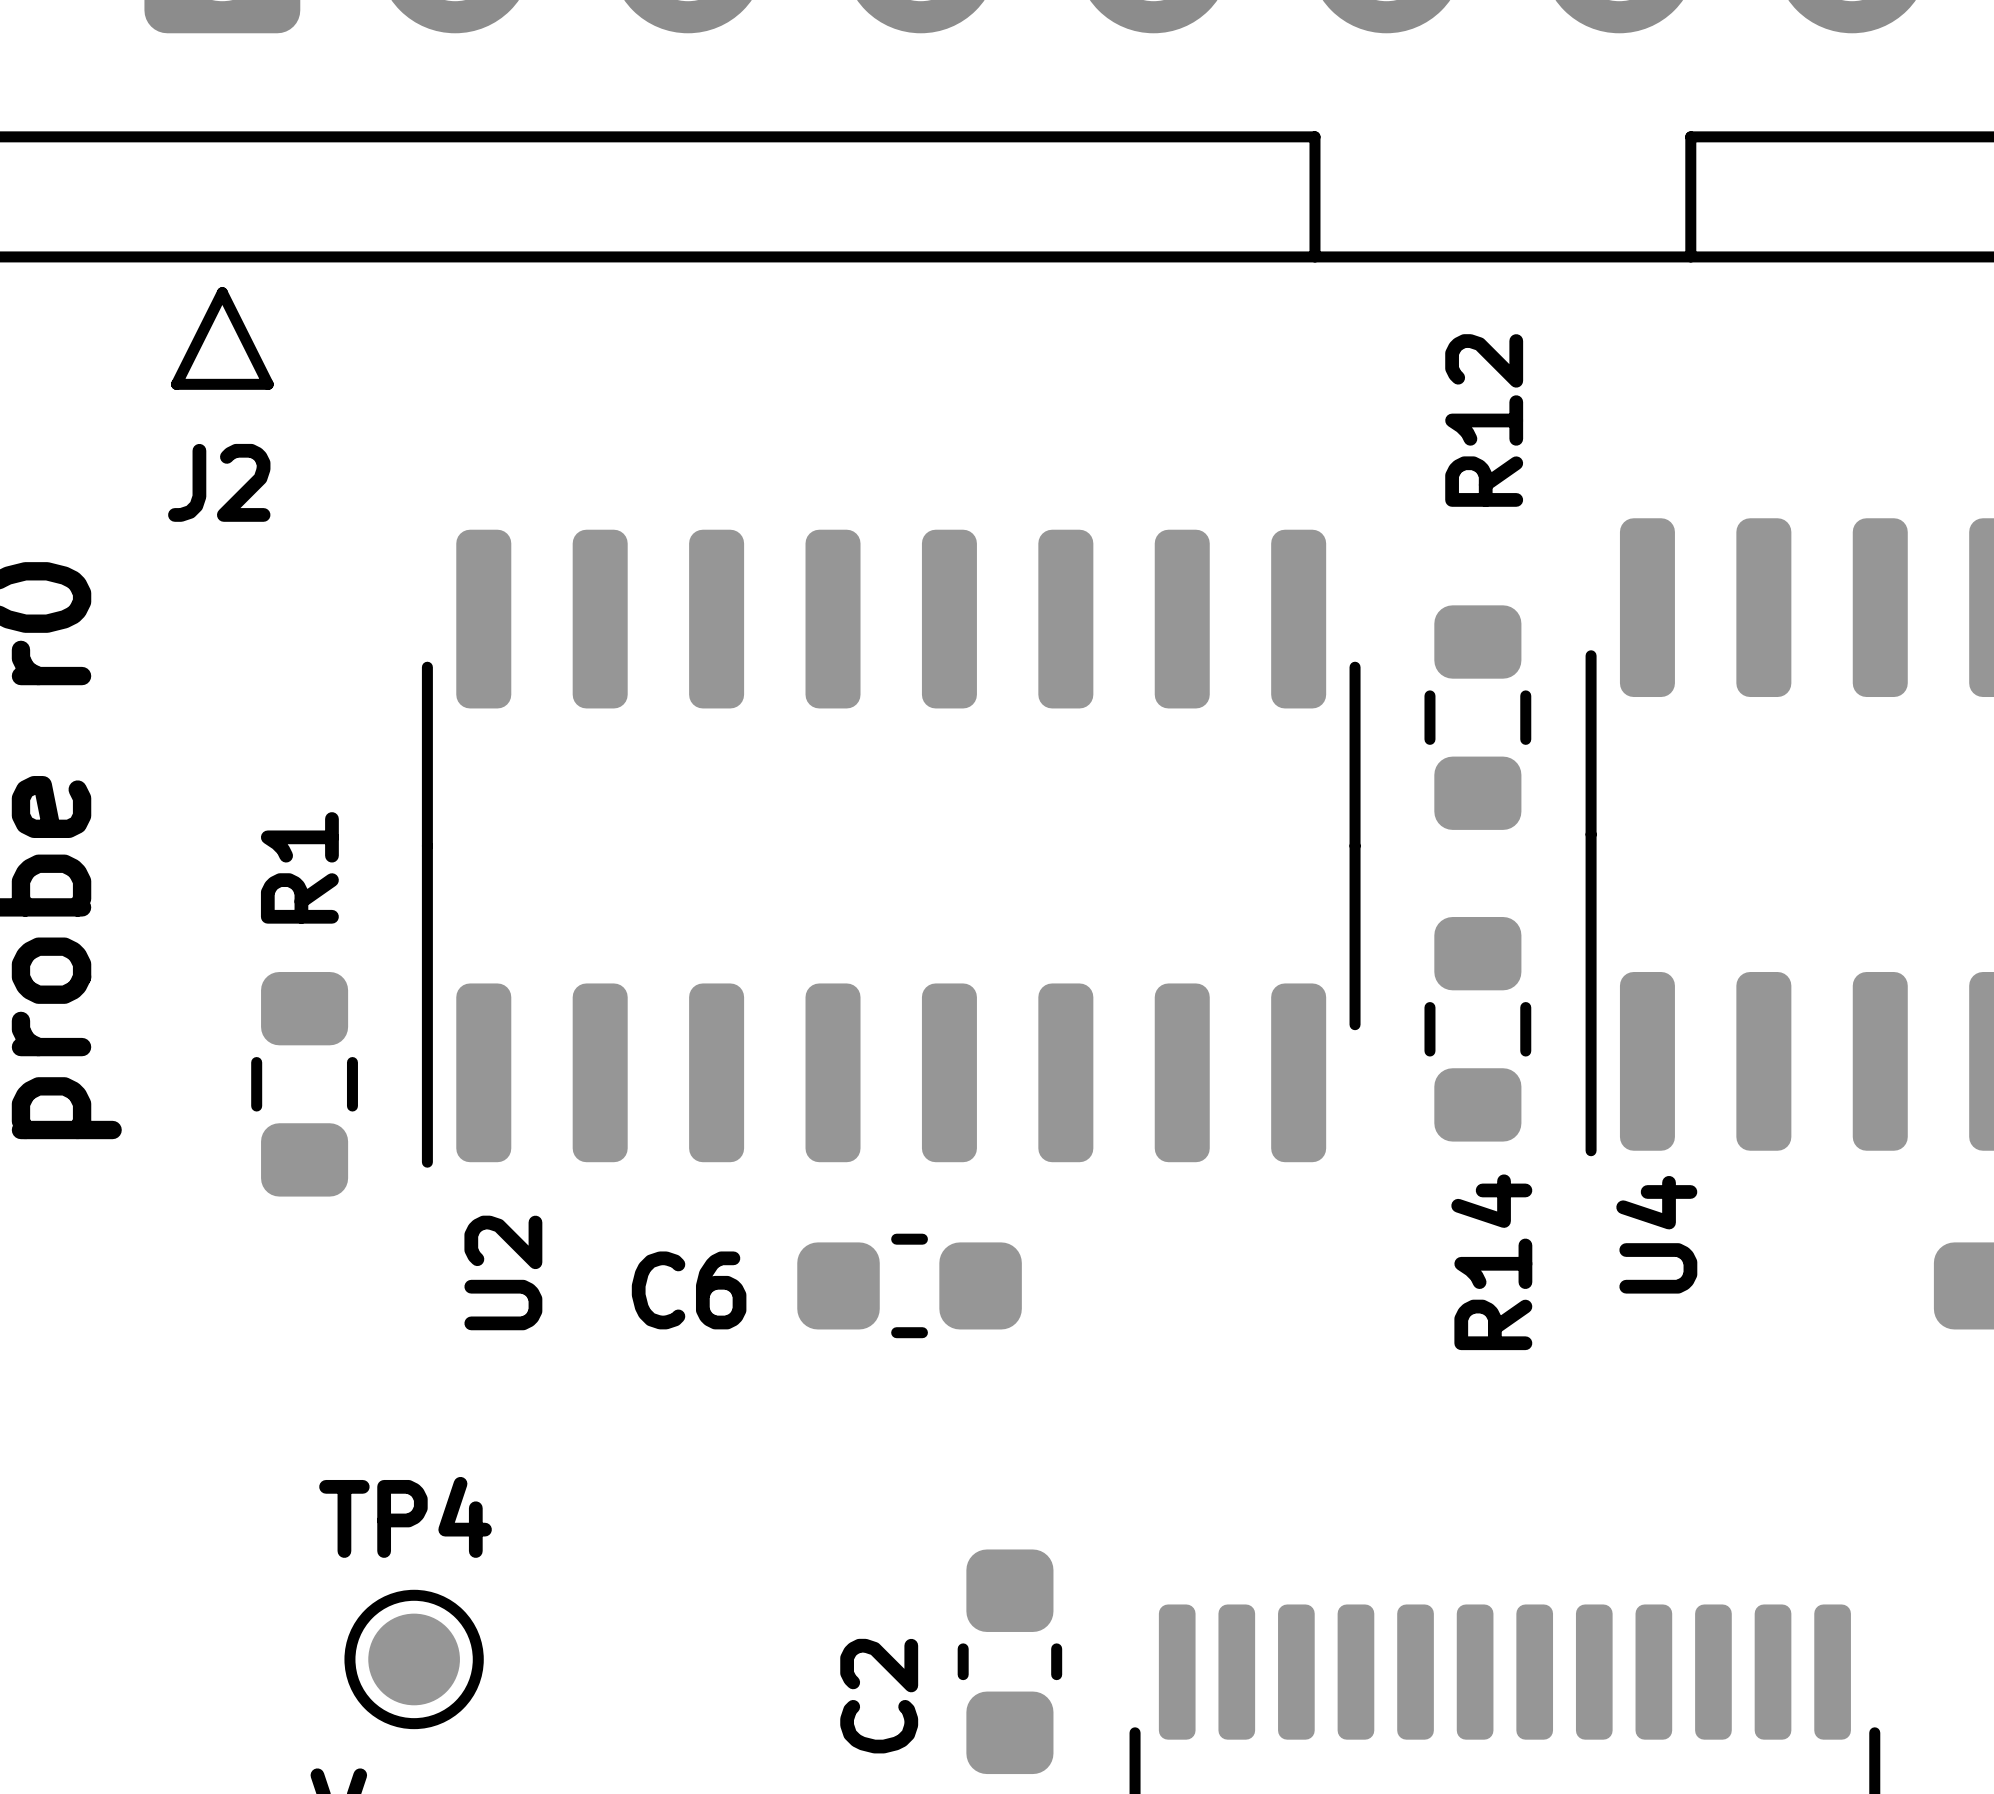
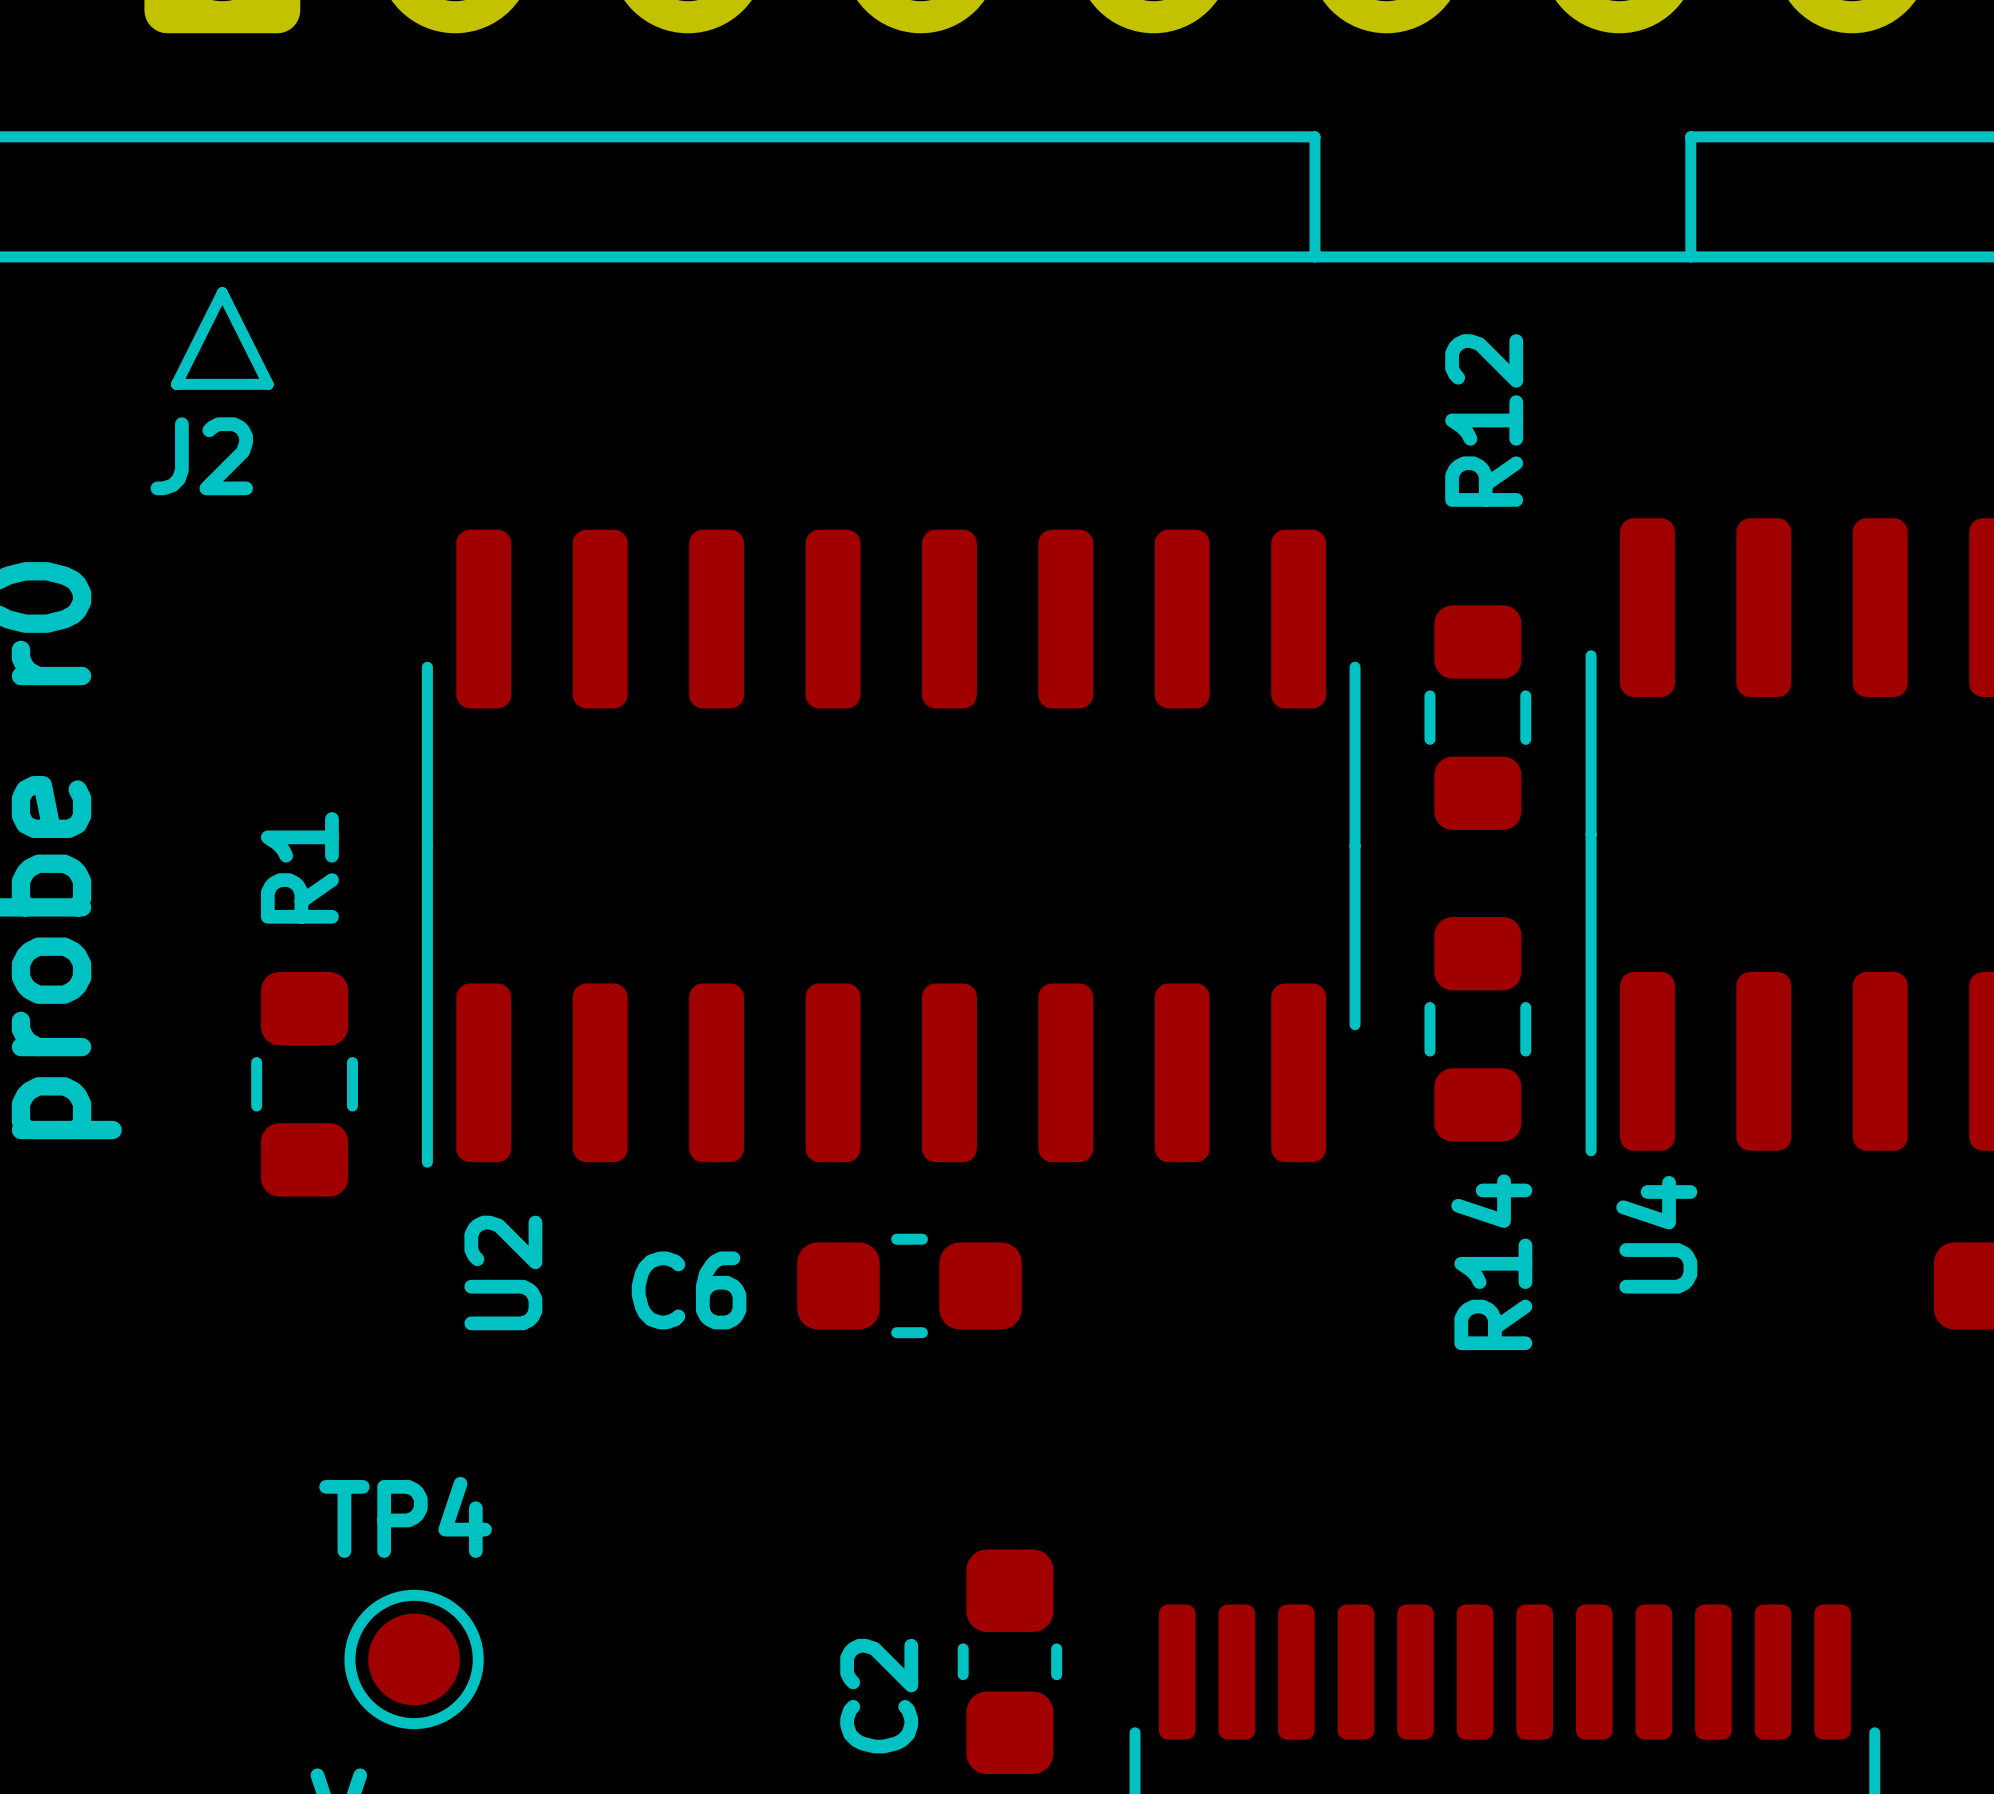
J2 name position: J2 (219, 482) -> J2 (201, 456)

